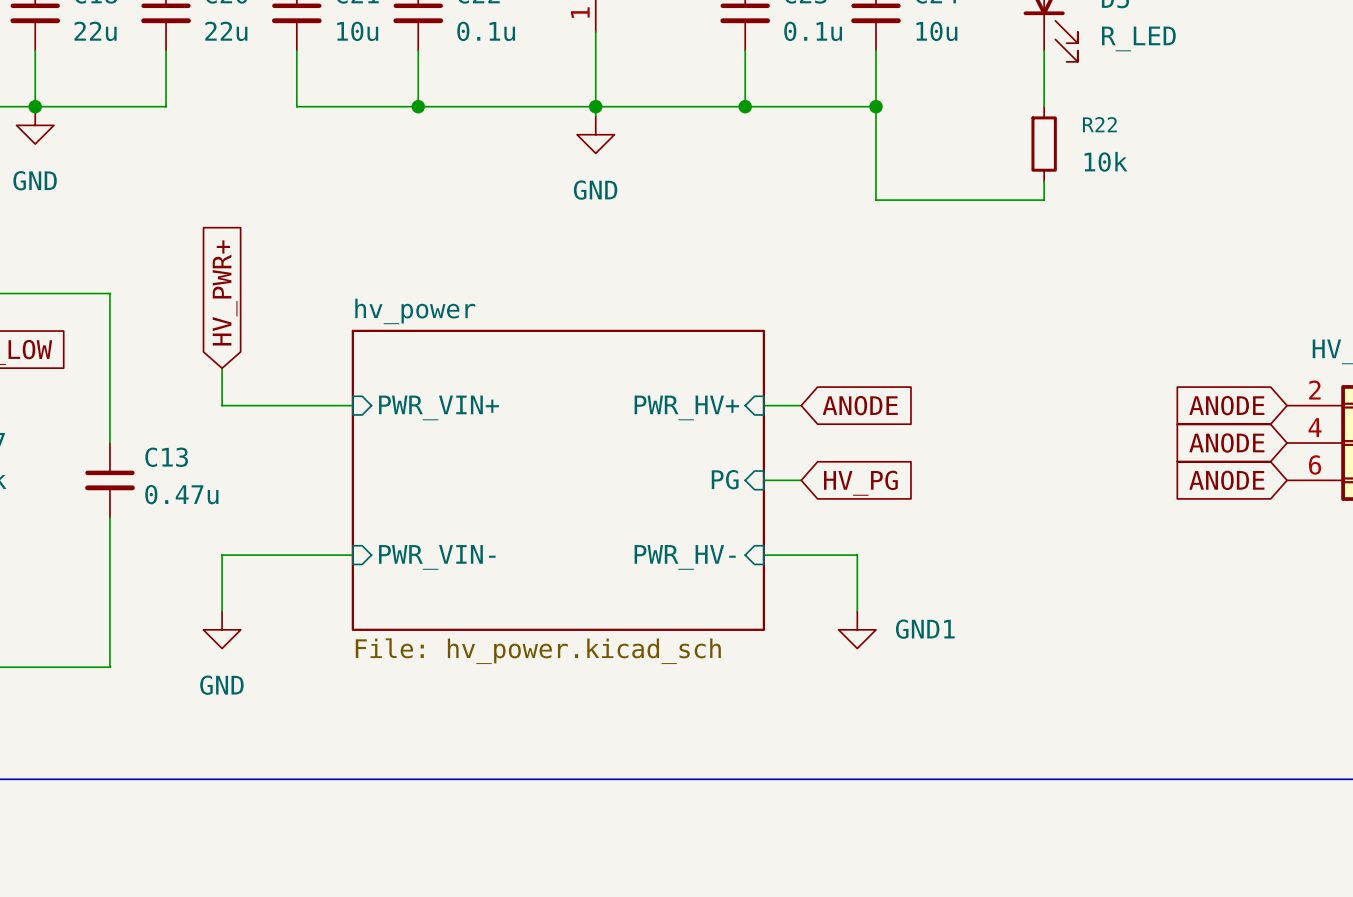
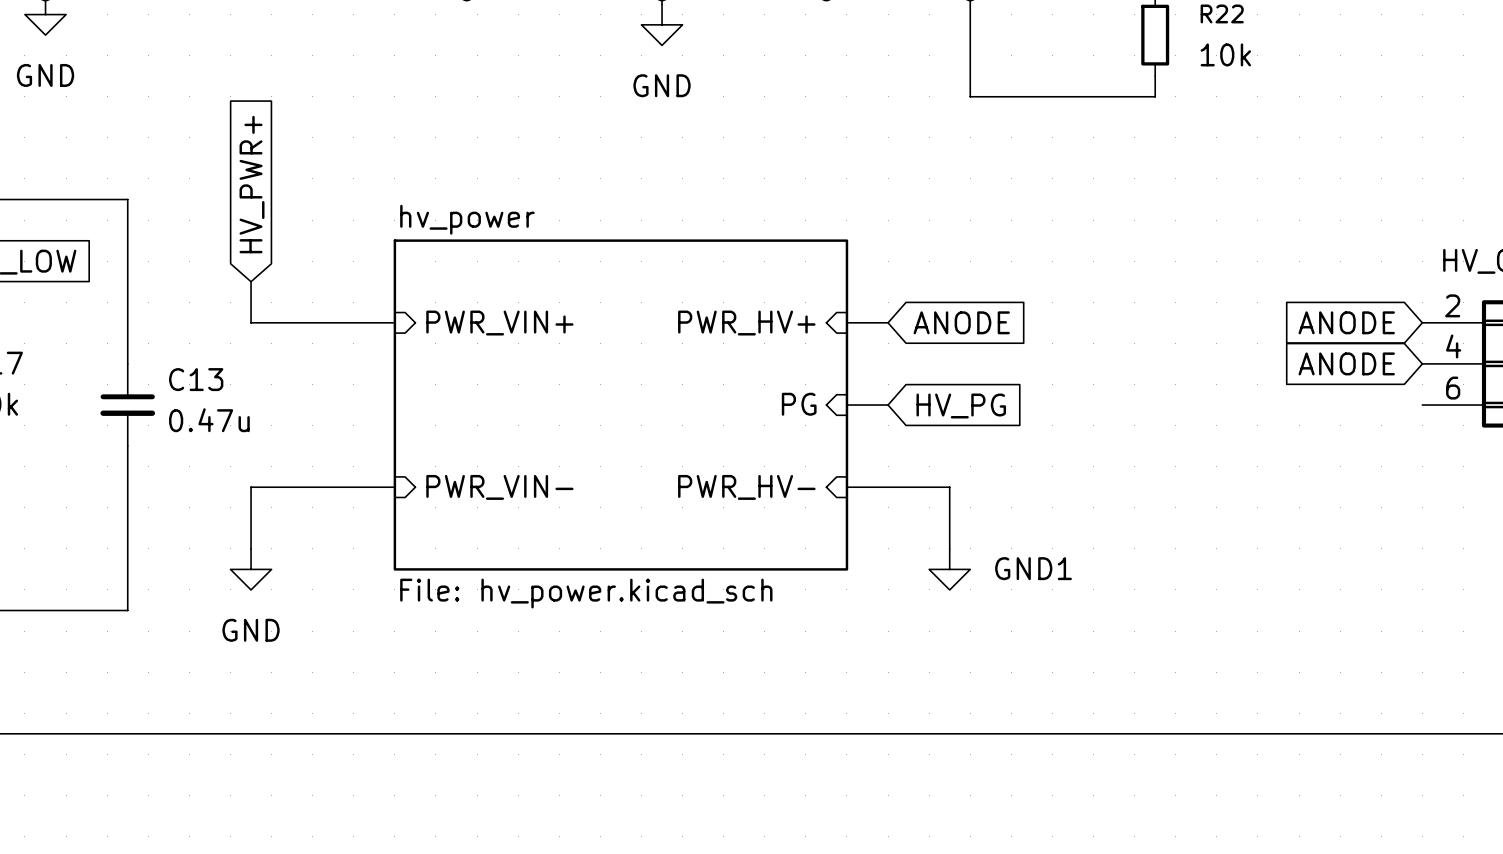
global label: ANODE (1226, 480) -> none

